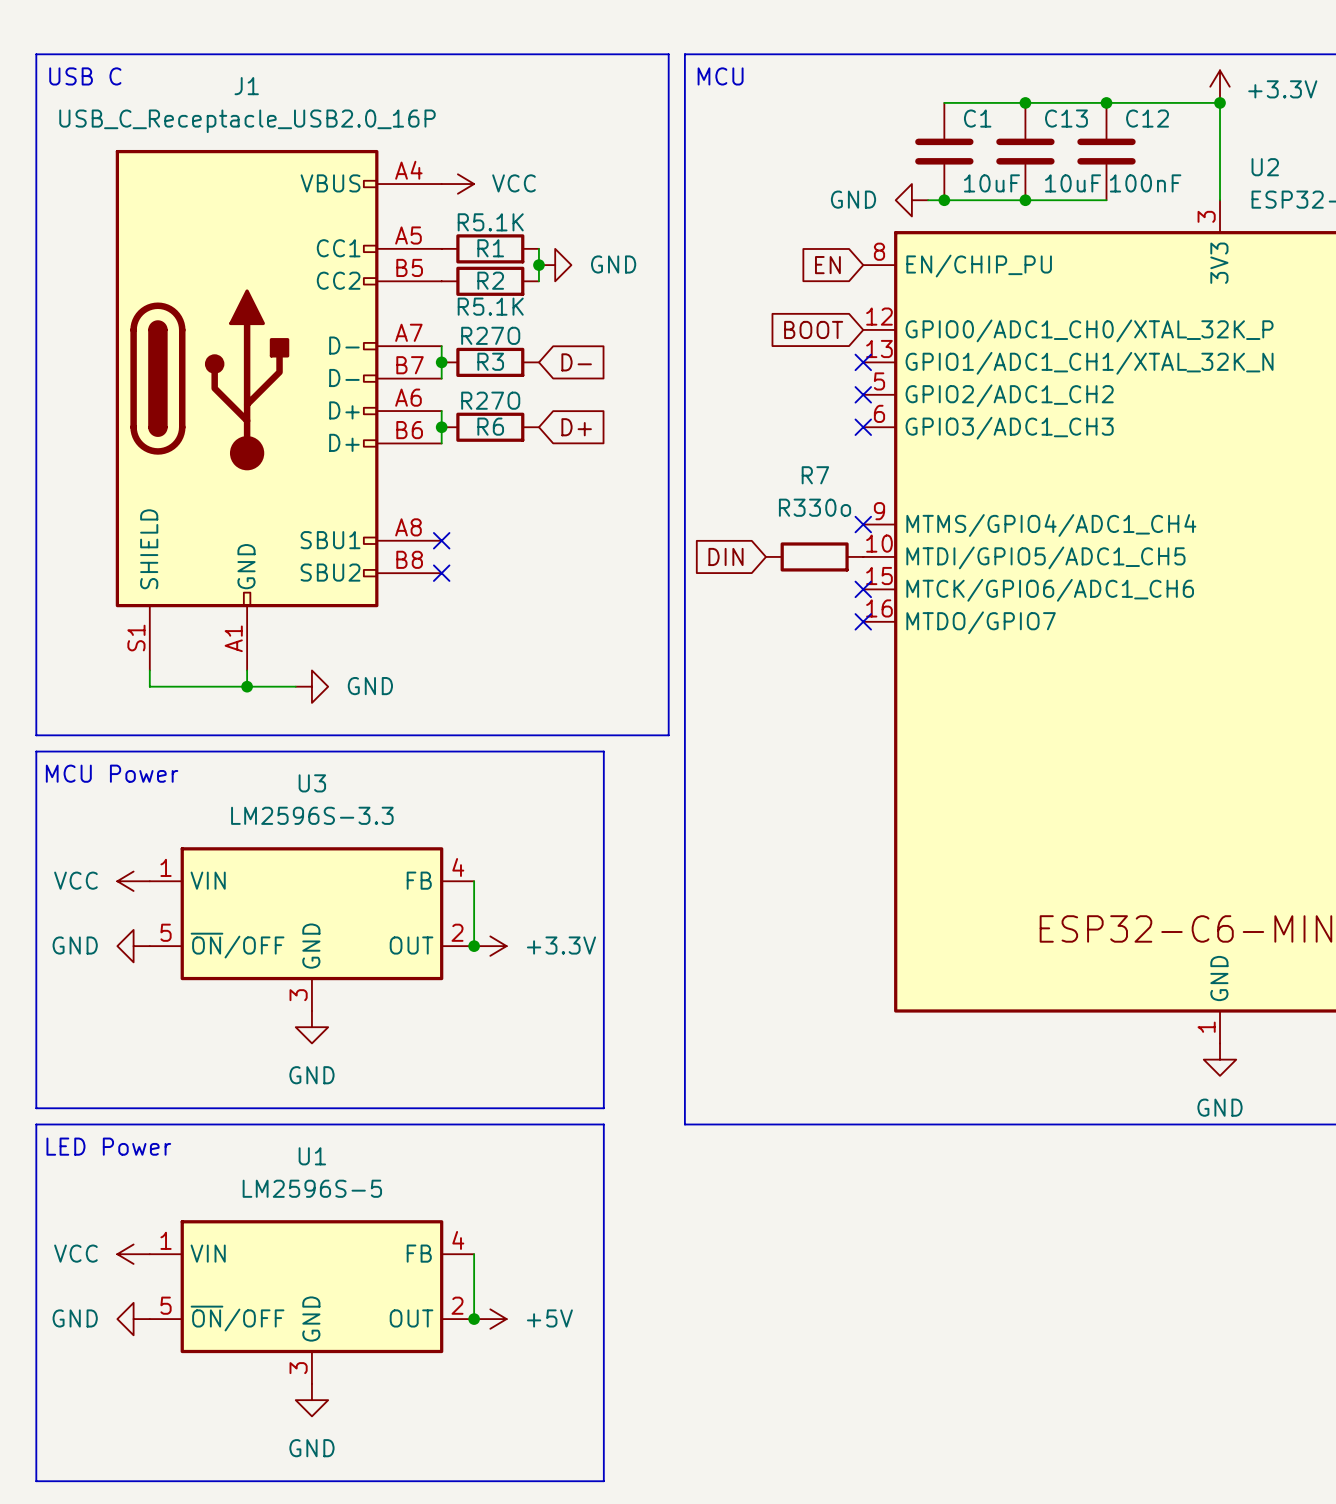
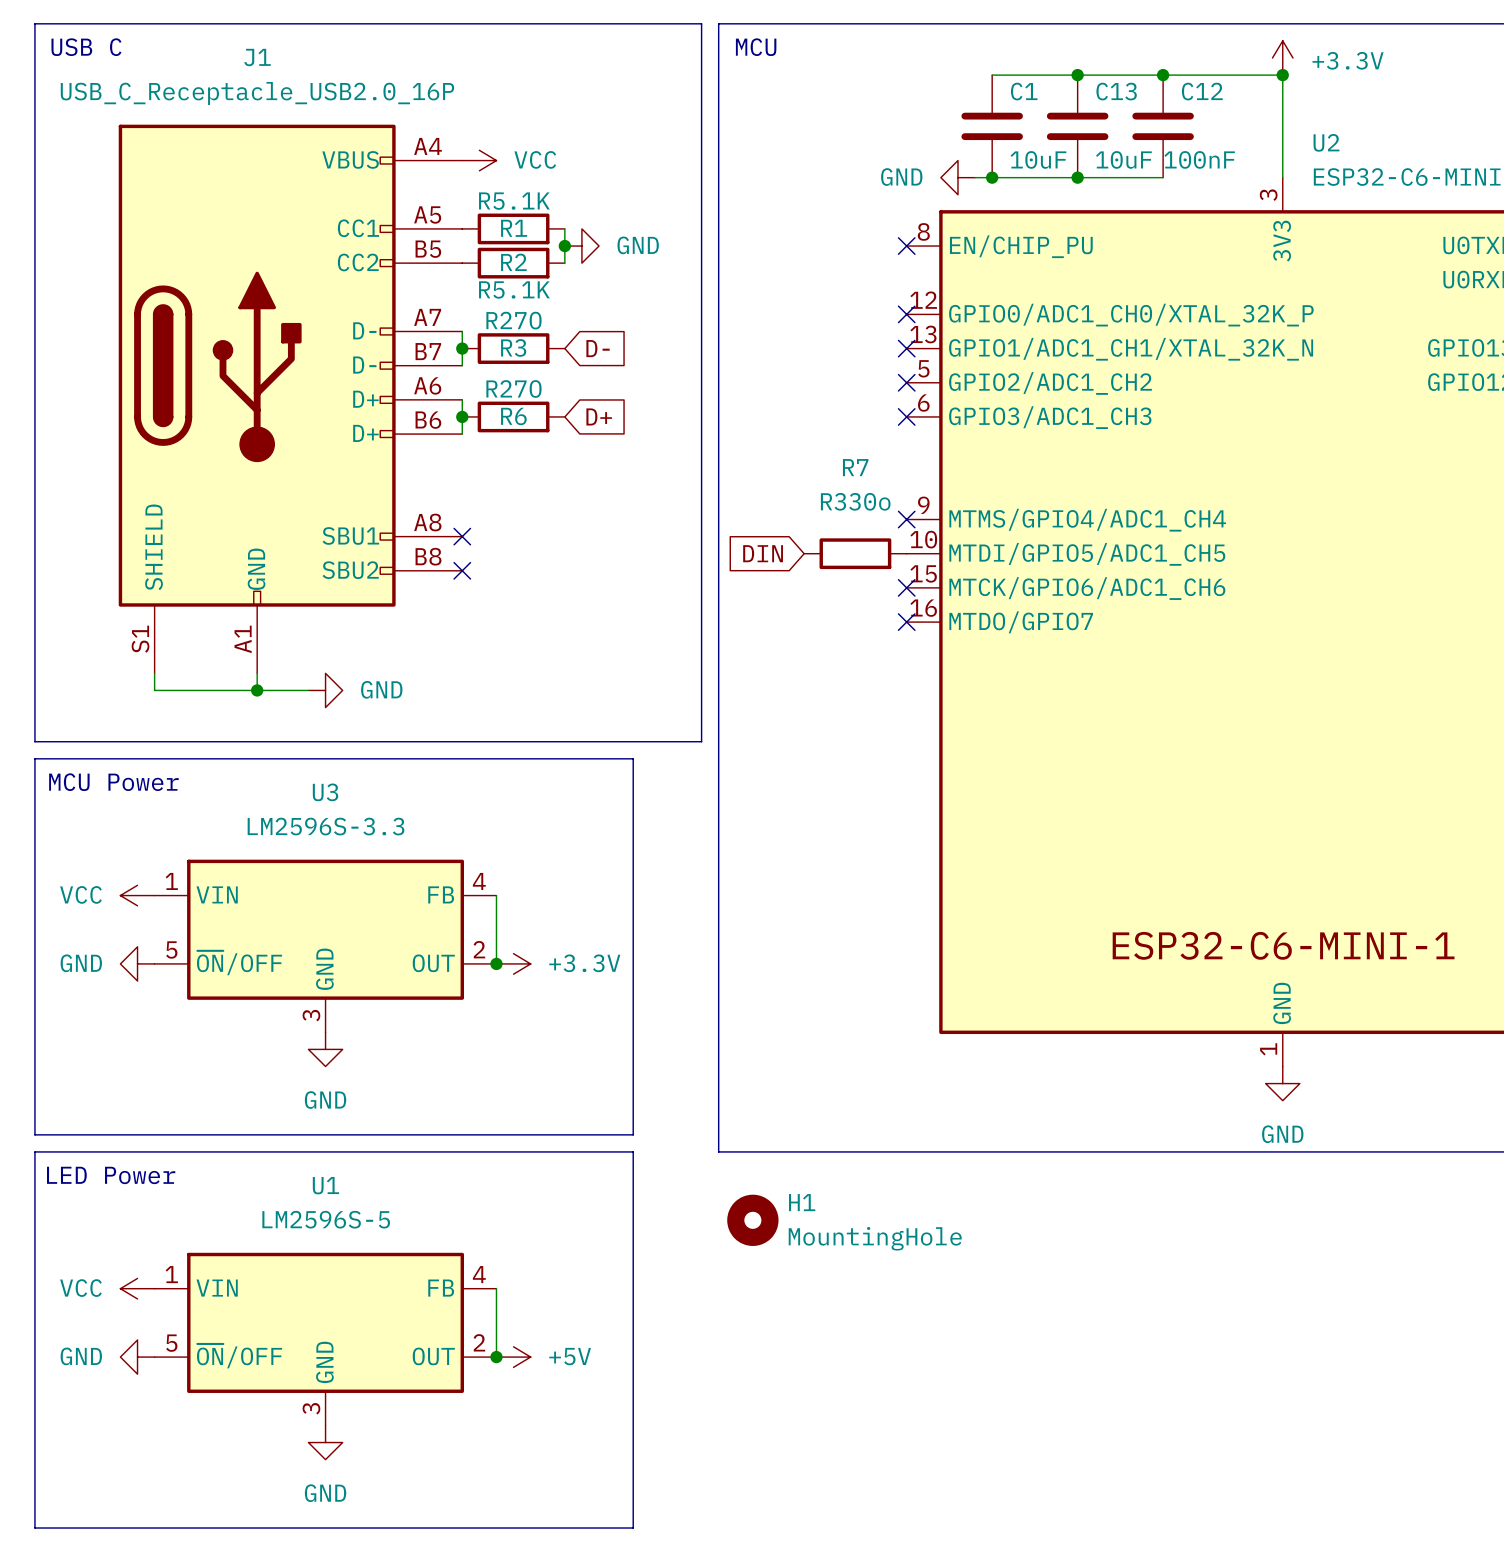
global label: EN (827, 265) -> none
no-connect mark: none -> (906, 246)
global label: BOOT (813, 329) -> none
no-connect mark: none -> (906, 314)
H1: none -> MountingHole (752, 1220)

